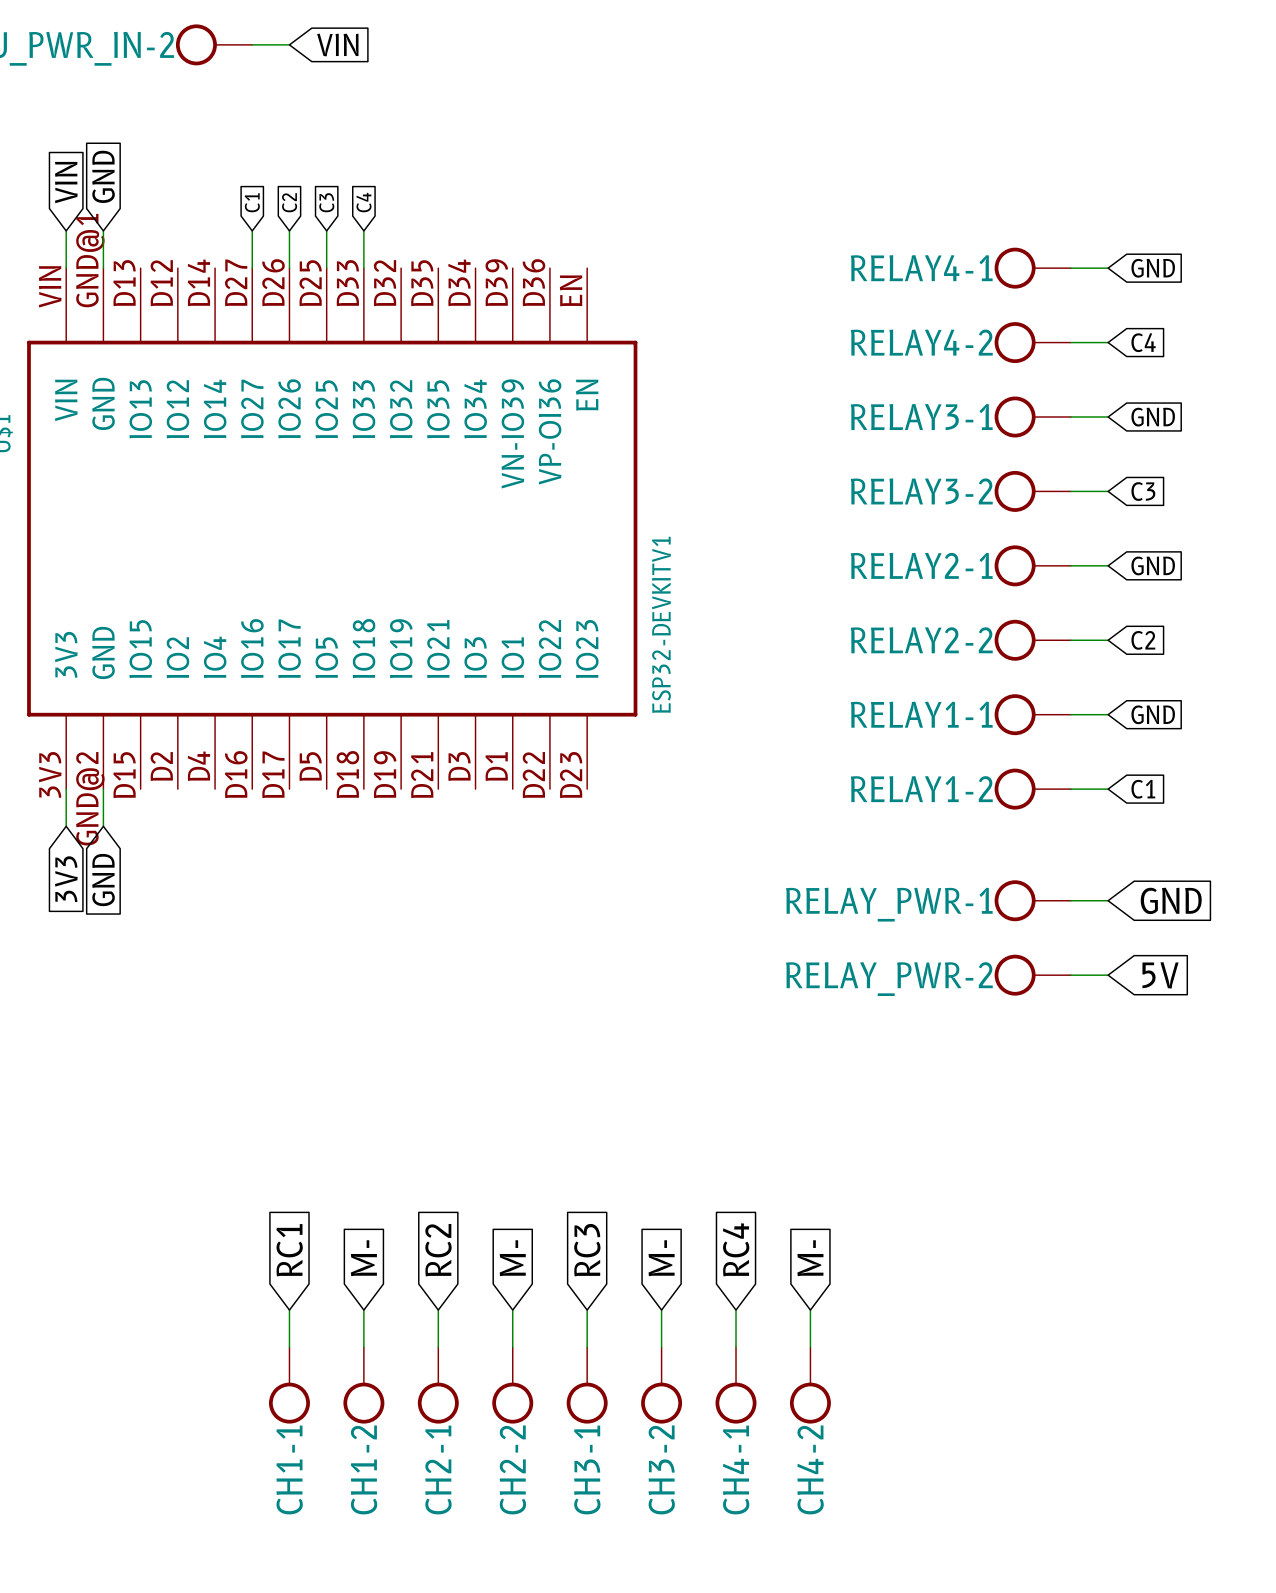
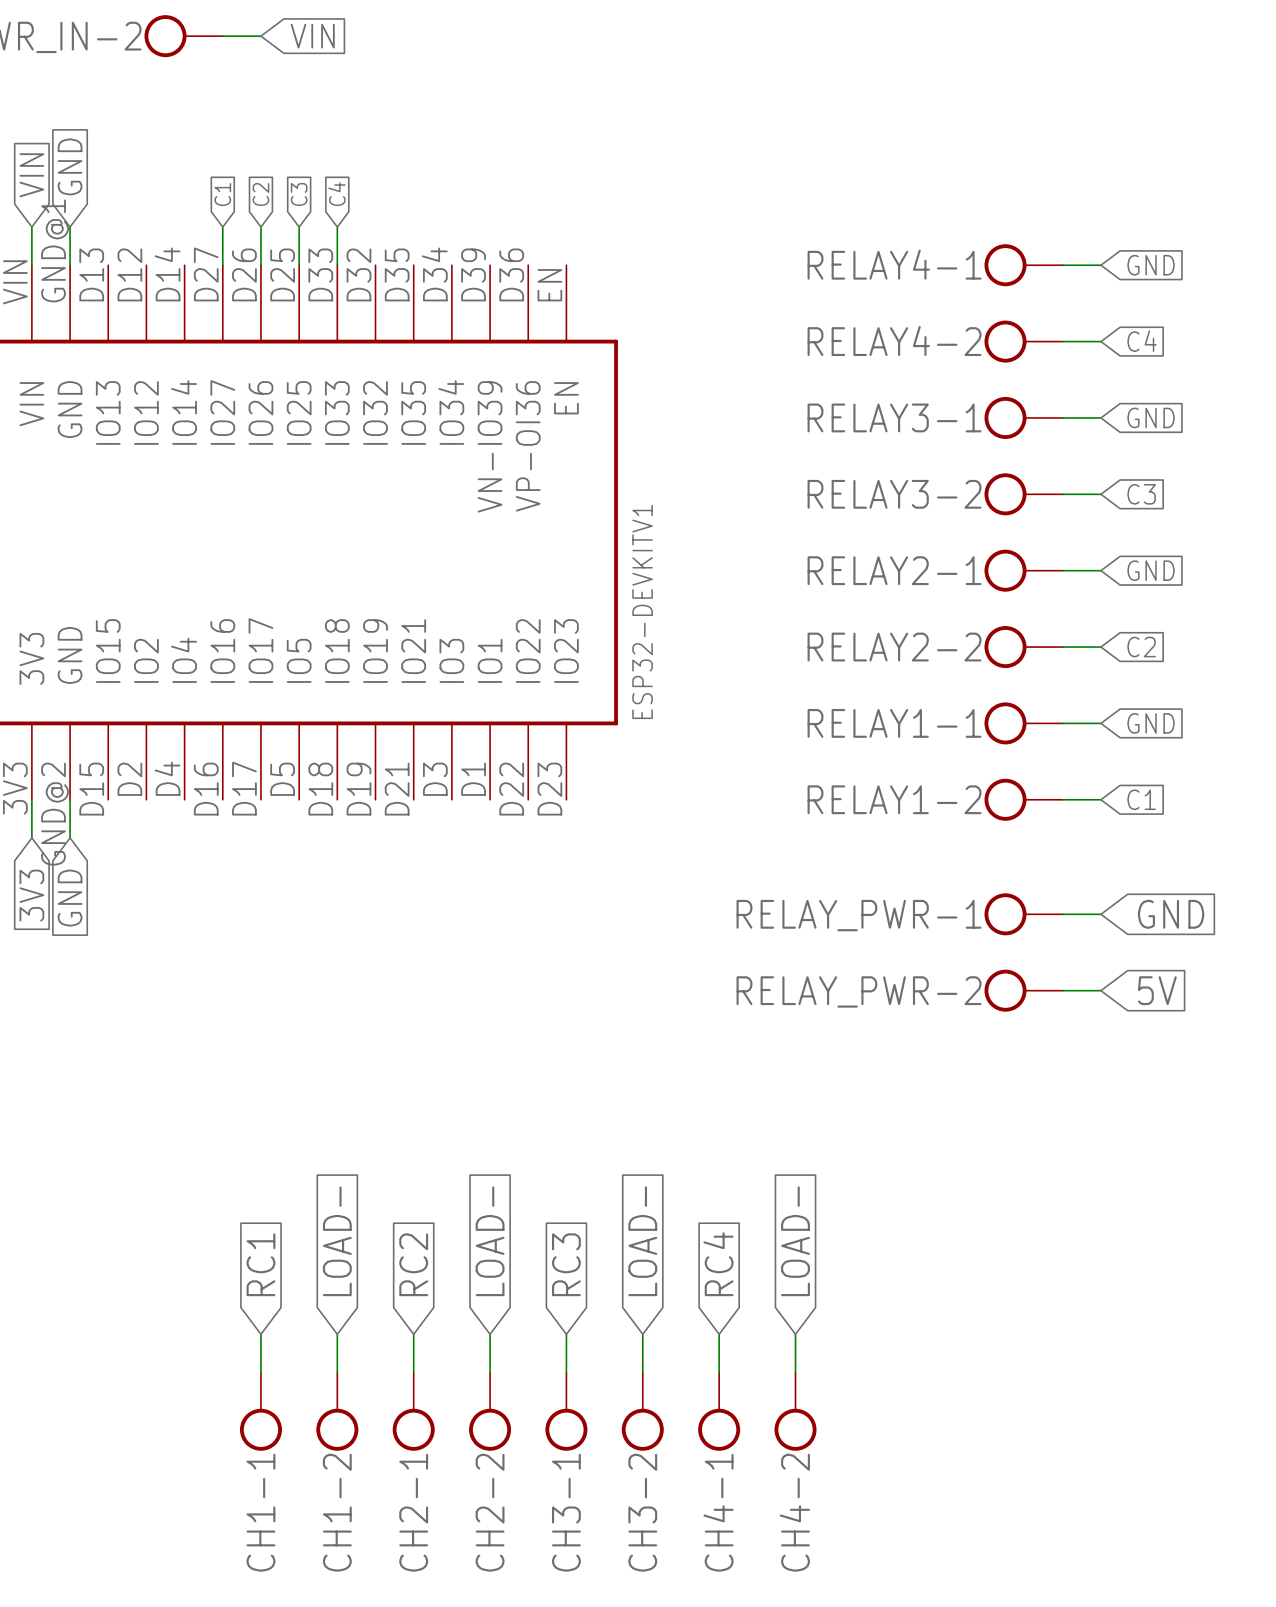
global label: M- (363, 1258) -> LOAD- (337, 1241)
global label: M- (512, 1258) -> LOAD- (490, 1241)
global label: M- (661, 1258) -> LOAD- (642, 1241)
global label: M- (810, 1258) -> LOAD- (795, 1241)

